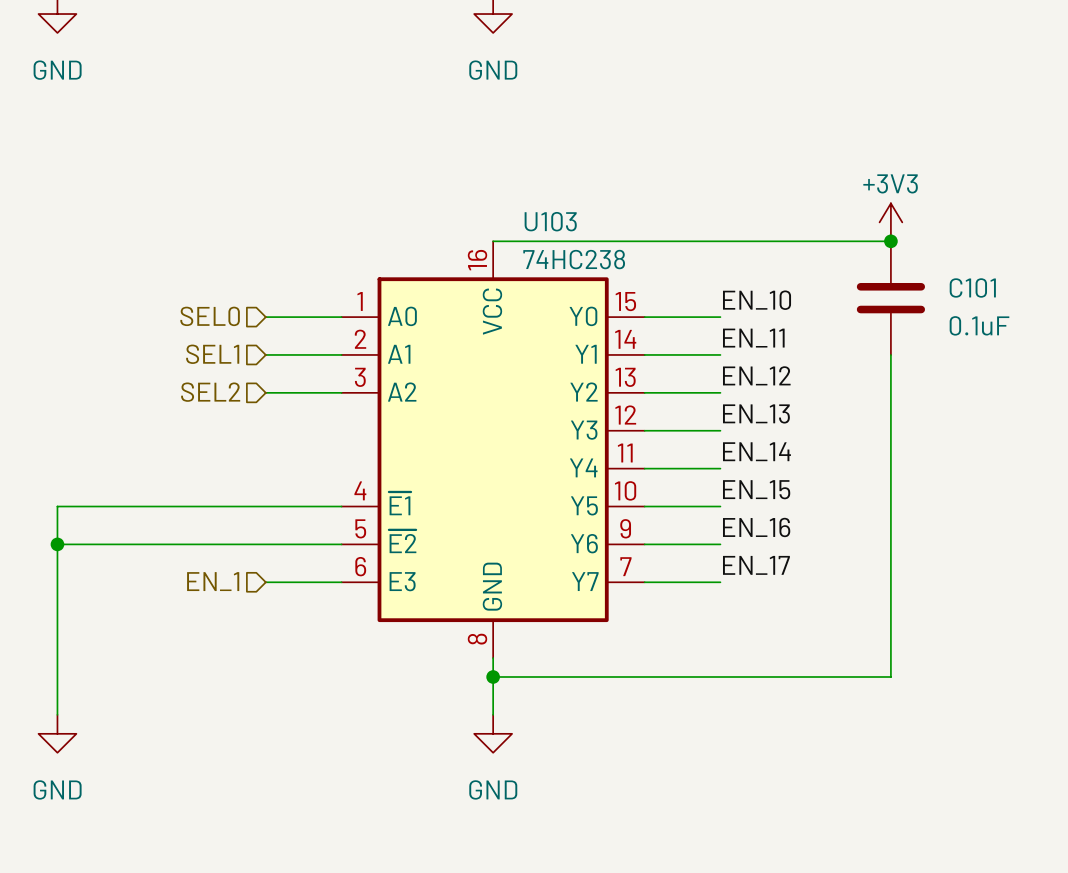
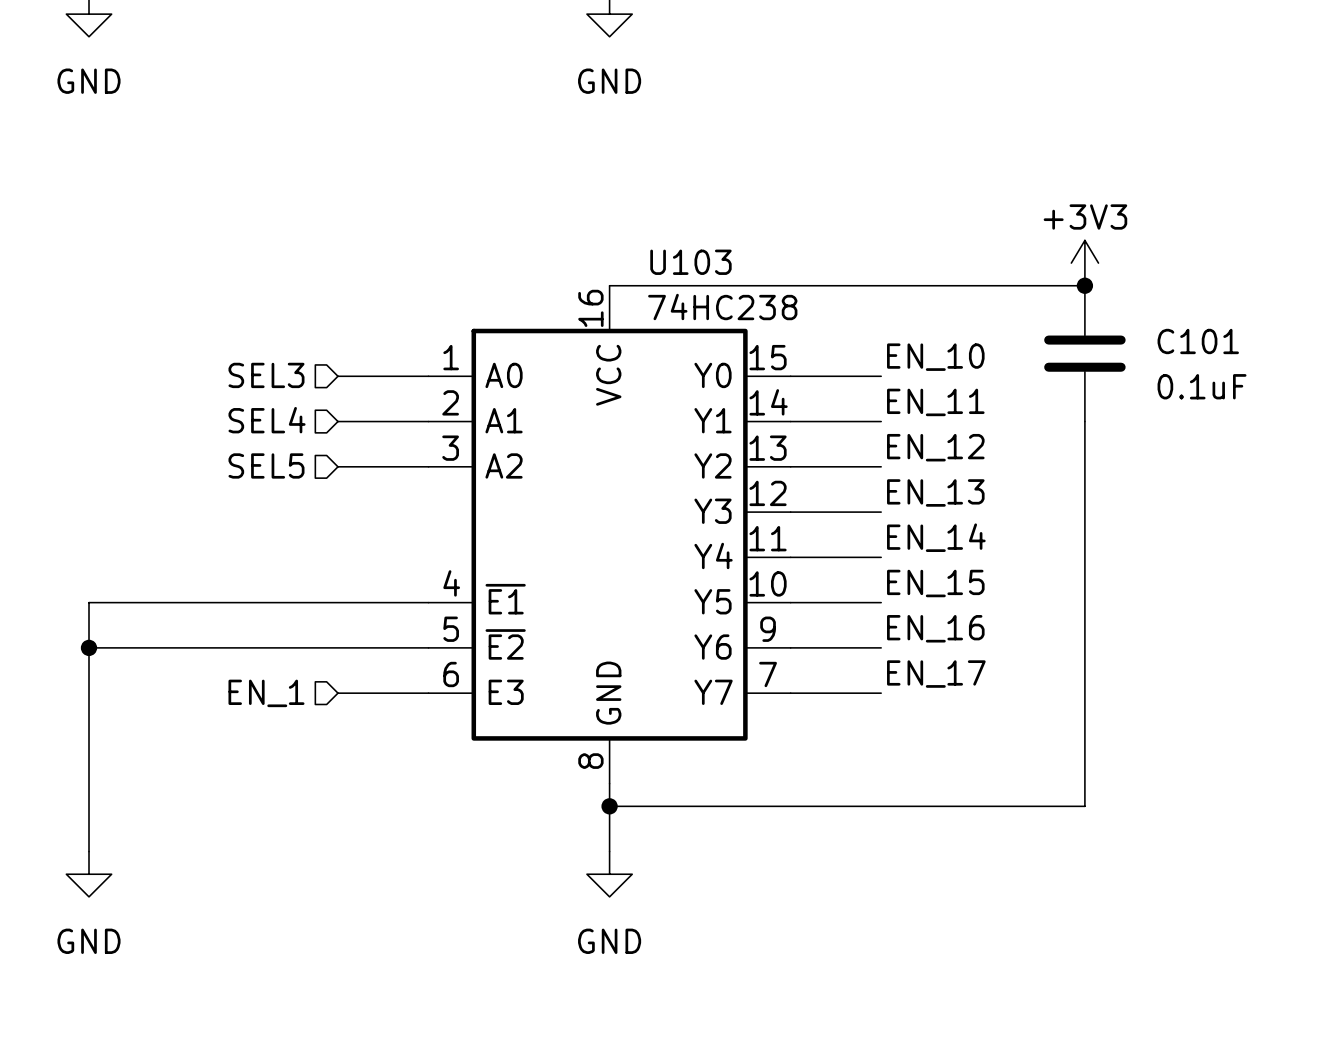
hierarchical label: SEL0 (210, 316) -> SEL3 (266, 375)
hierarchical label: SEL1 (212, 354) -> SEL4 (267, 420)
hierarchical label: SEL2 (210, 392) -> SEL5 (266, 465)

